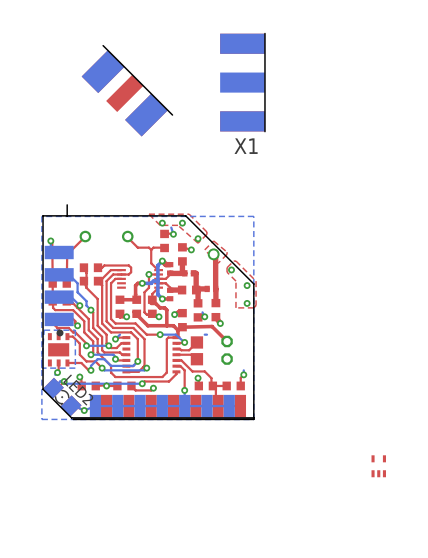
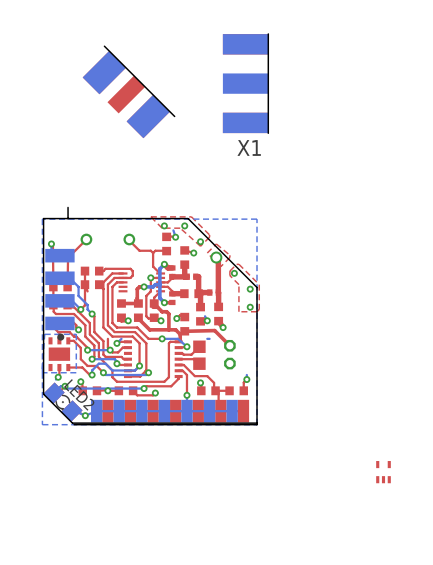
top track: (83, 267) (86, 272) (86, 287) (97, 298) (97, 325) (106, 334) -> (85, 271) (85, 305) (80, 309)

